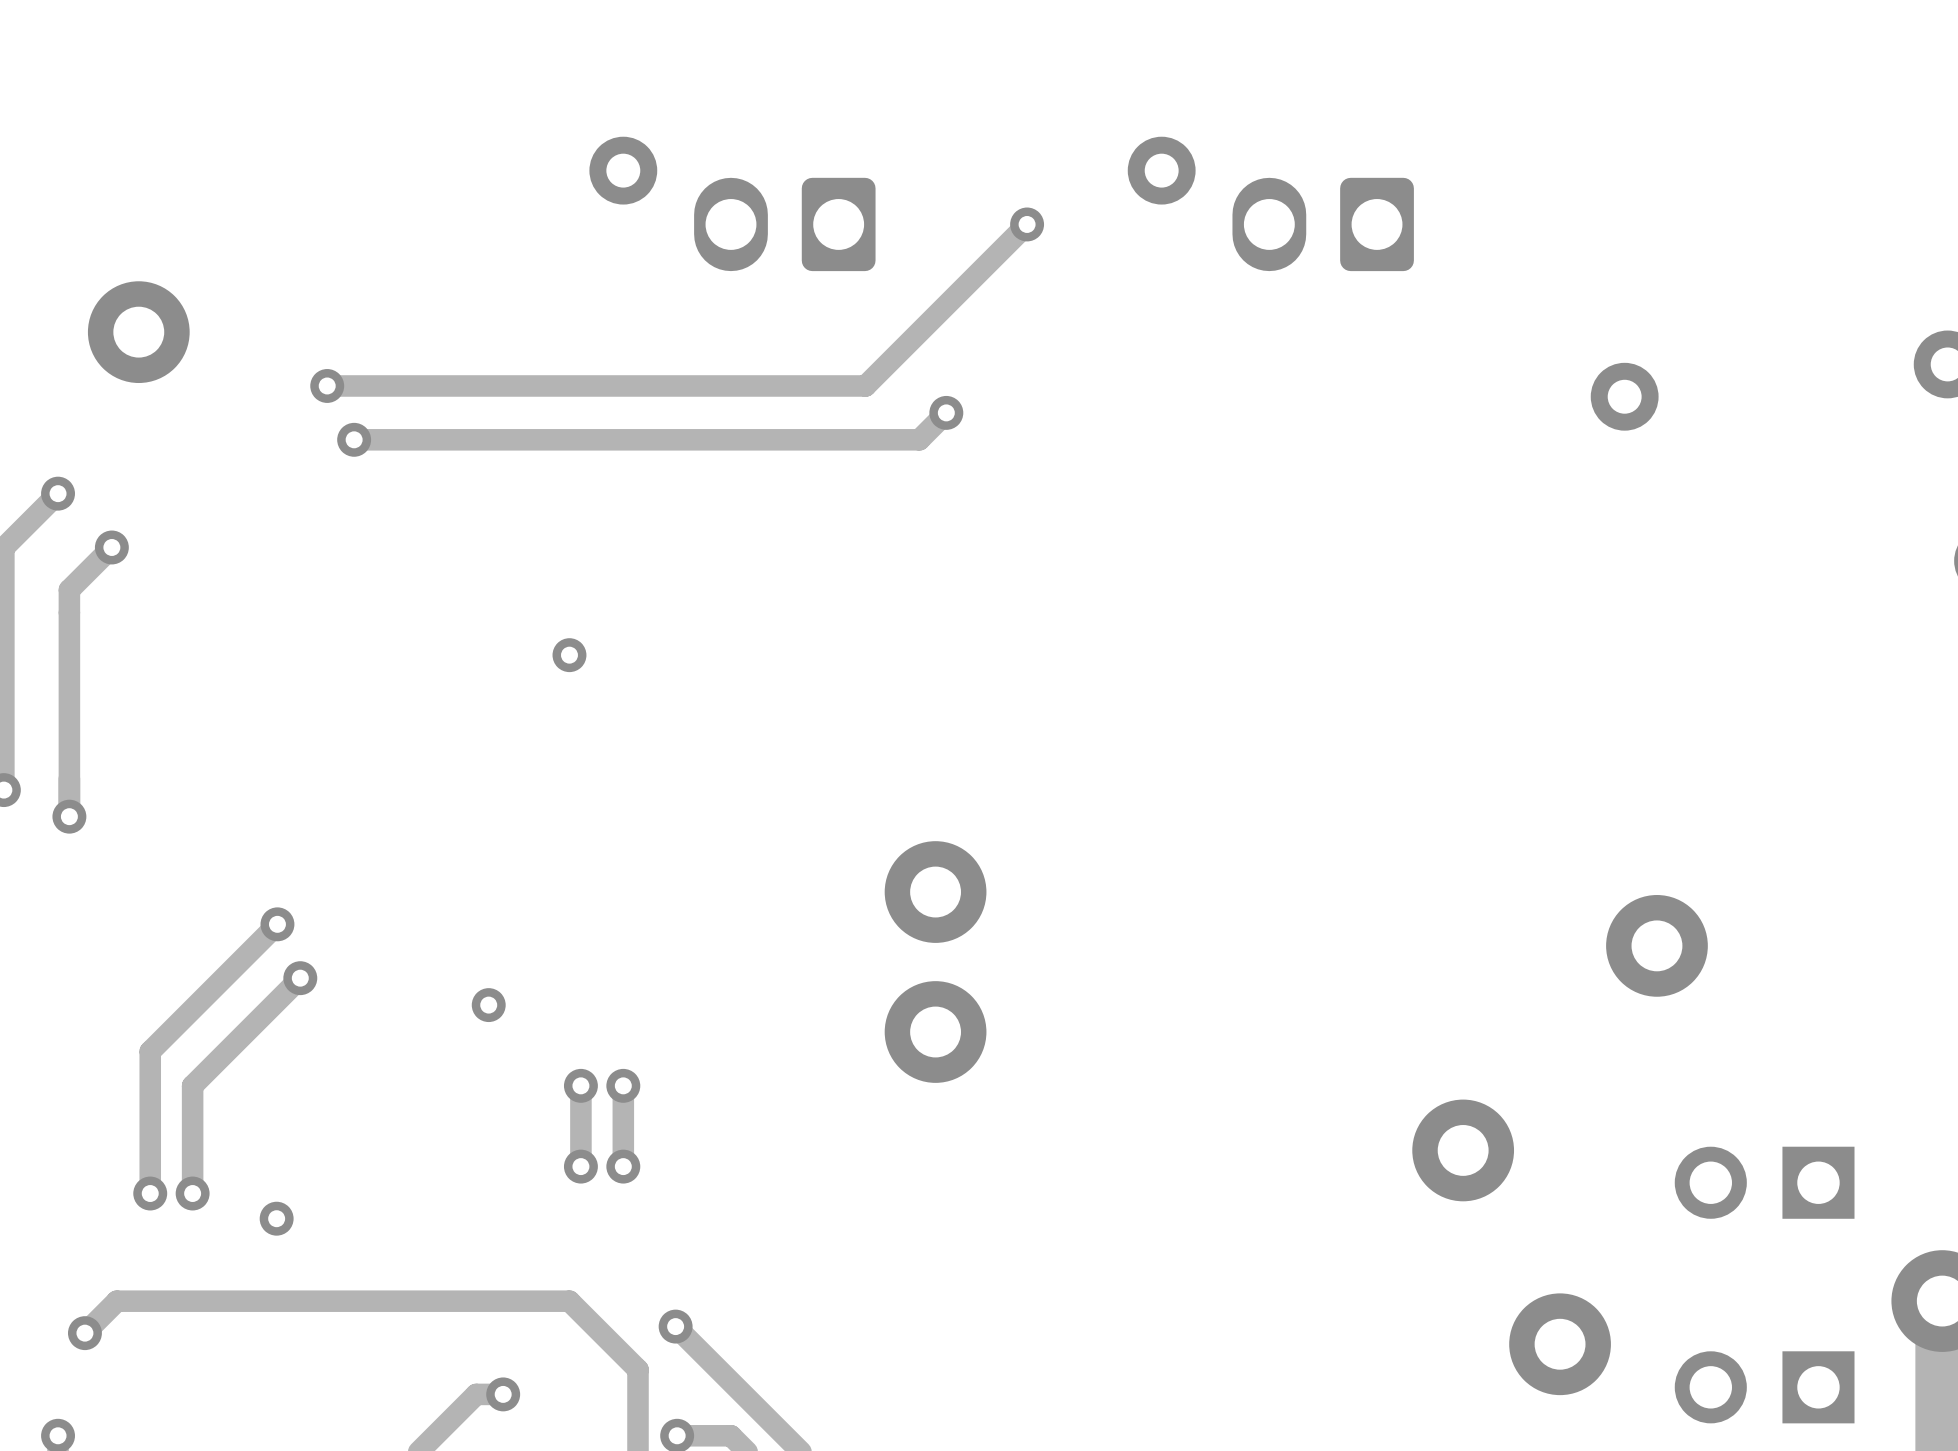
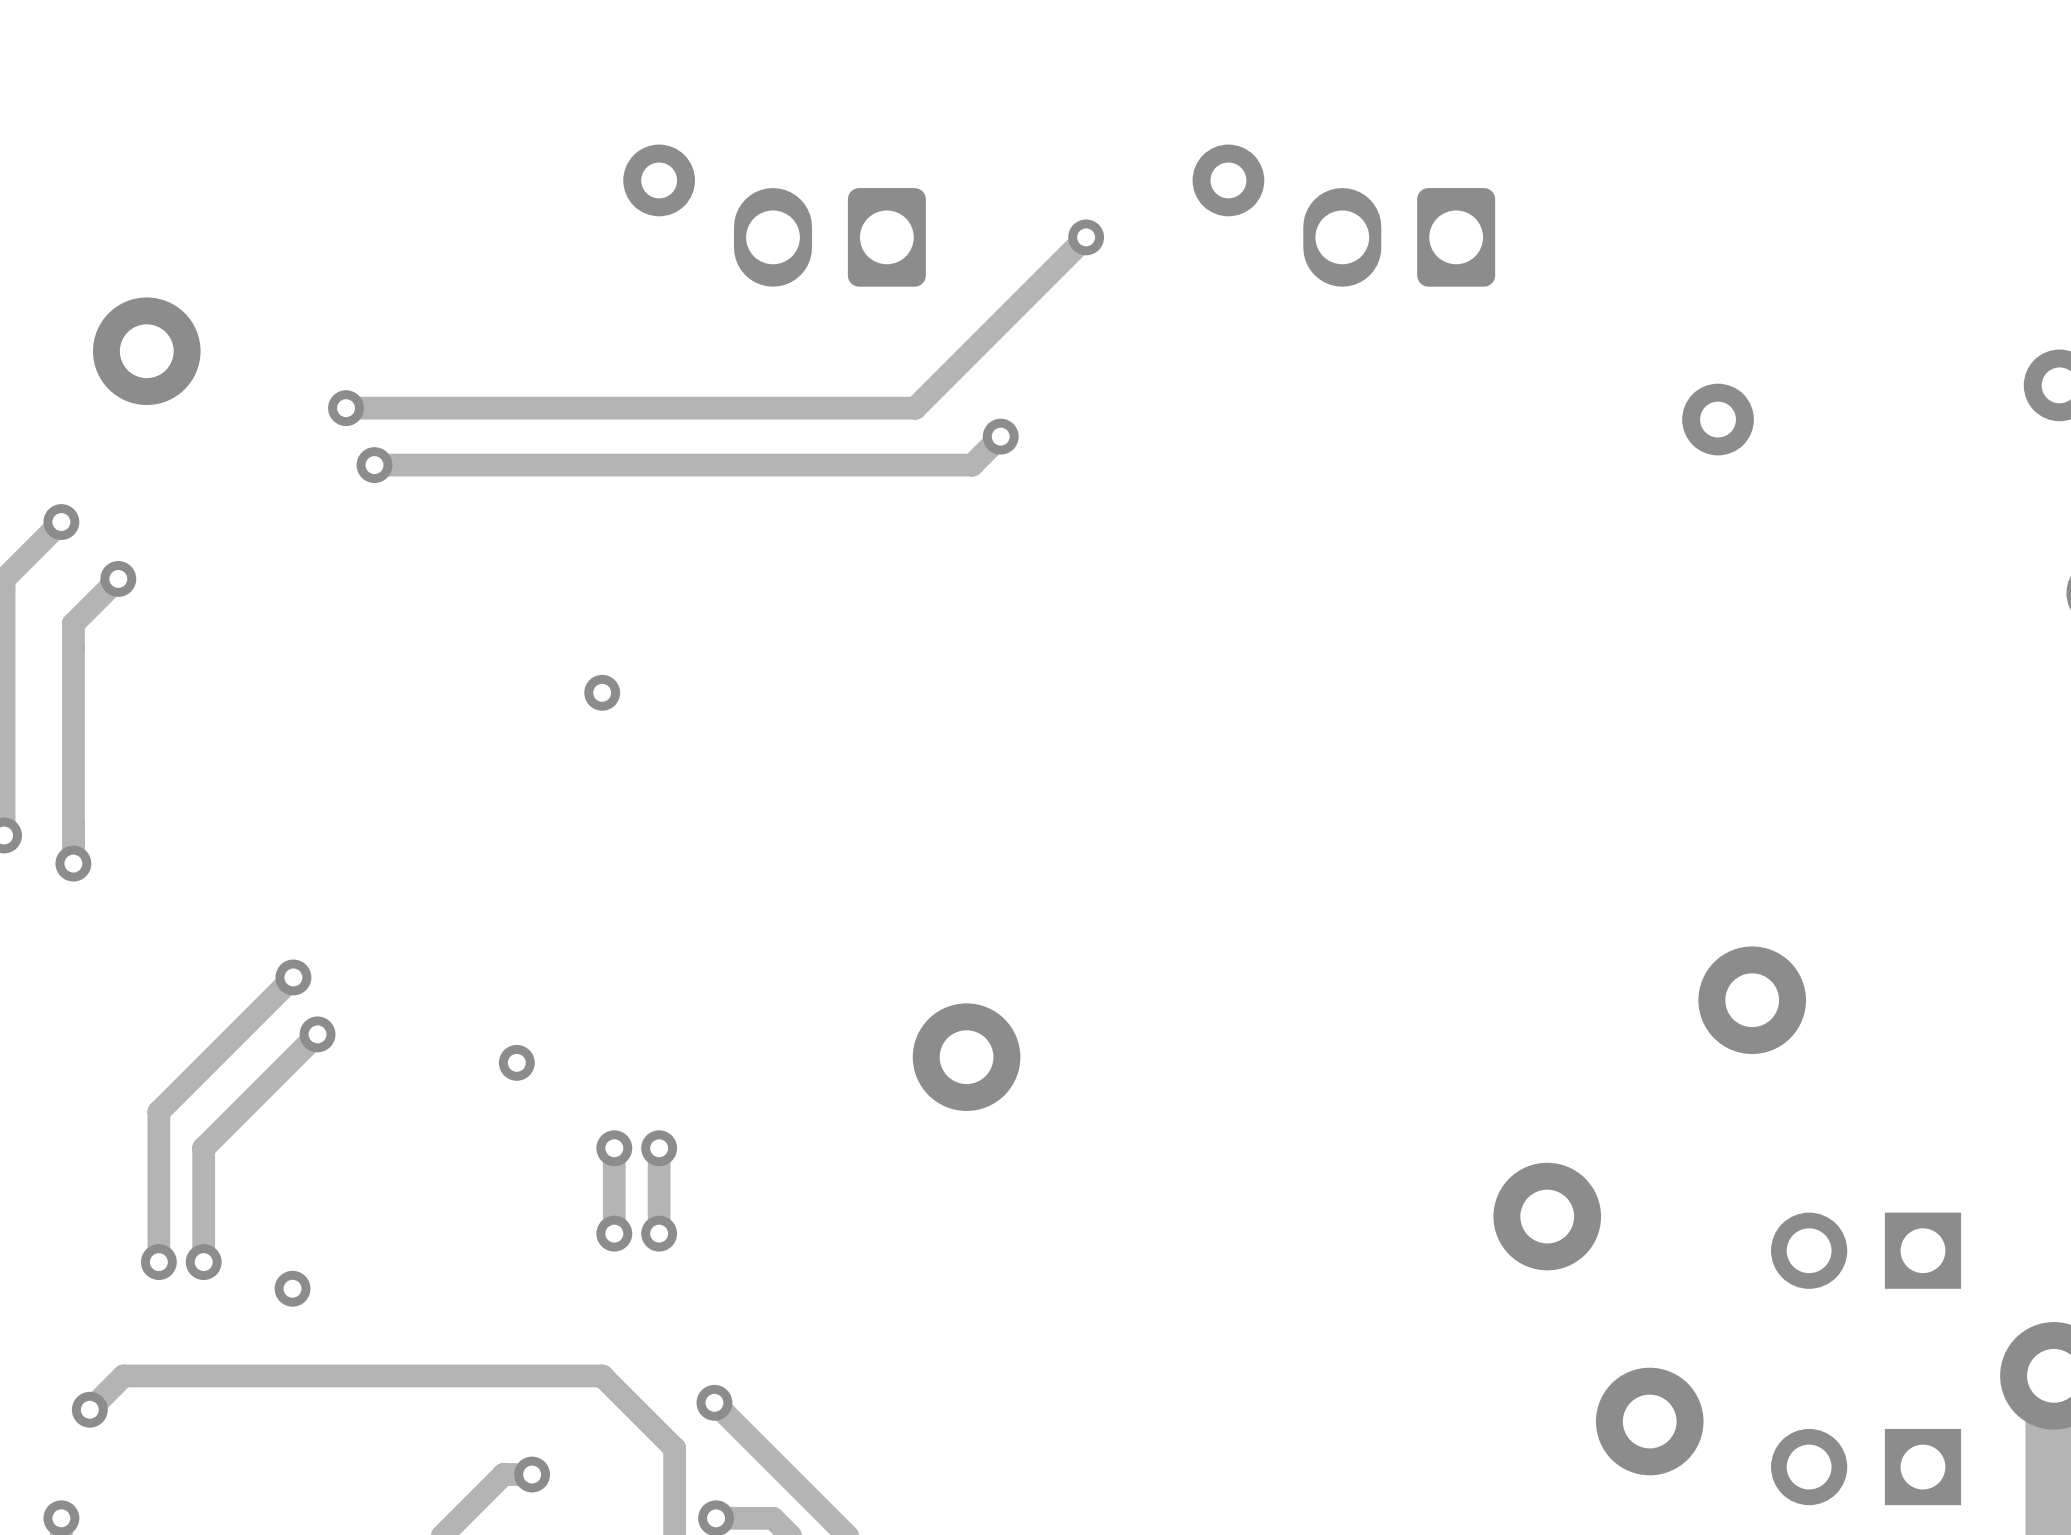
via: (935, 892) -> none
via position: (935, 1032) -> (966, 1057)

